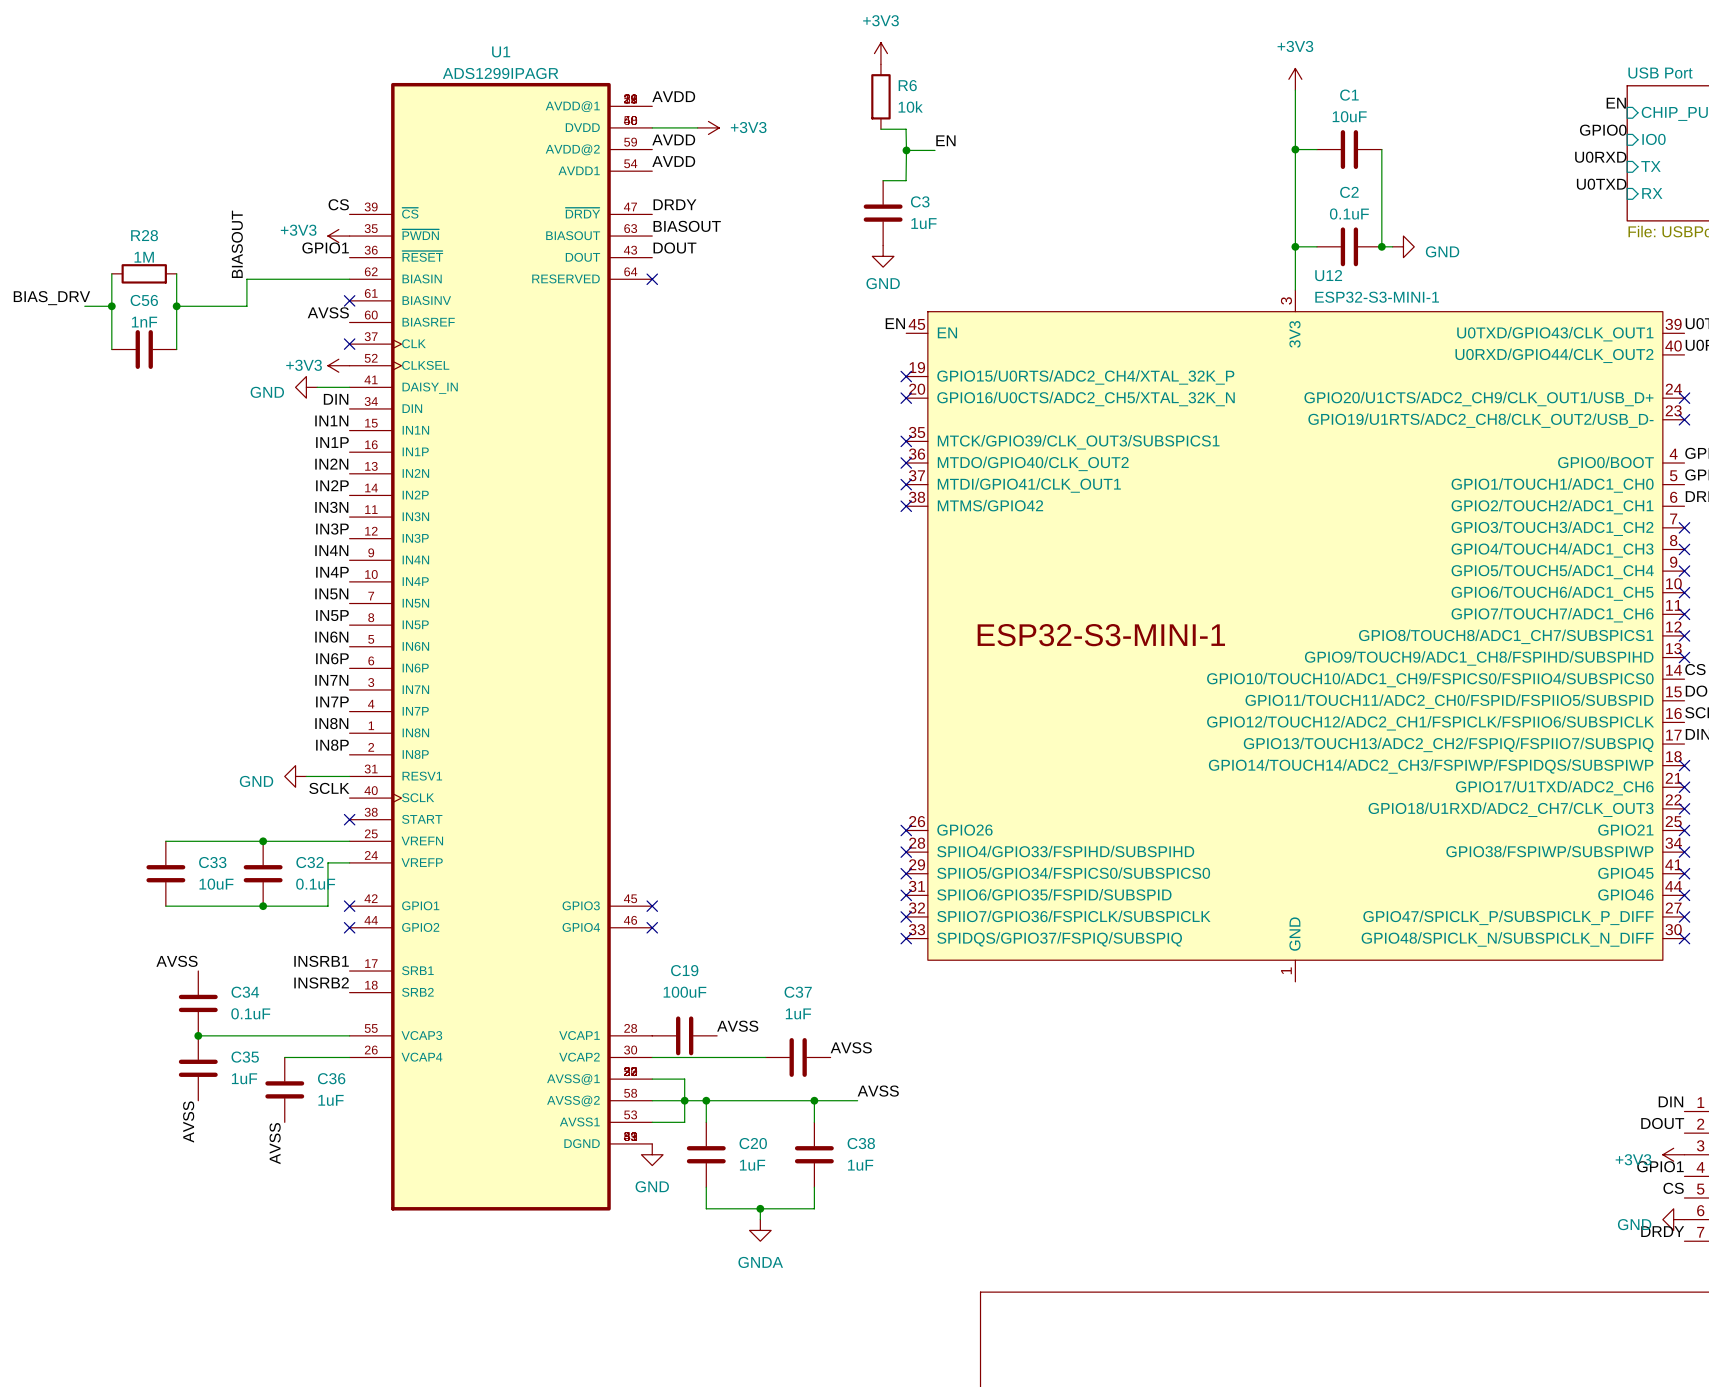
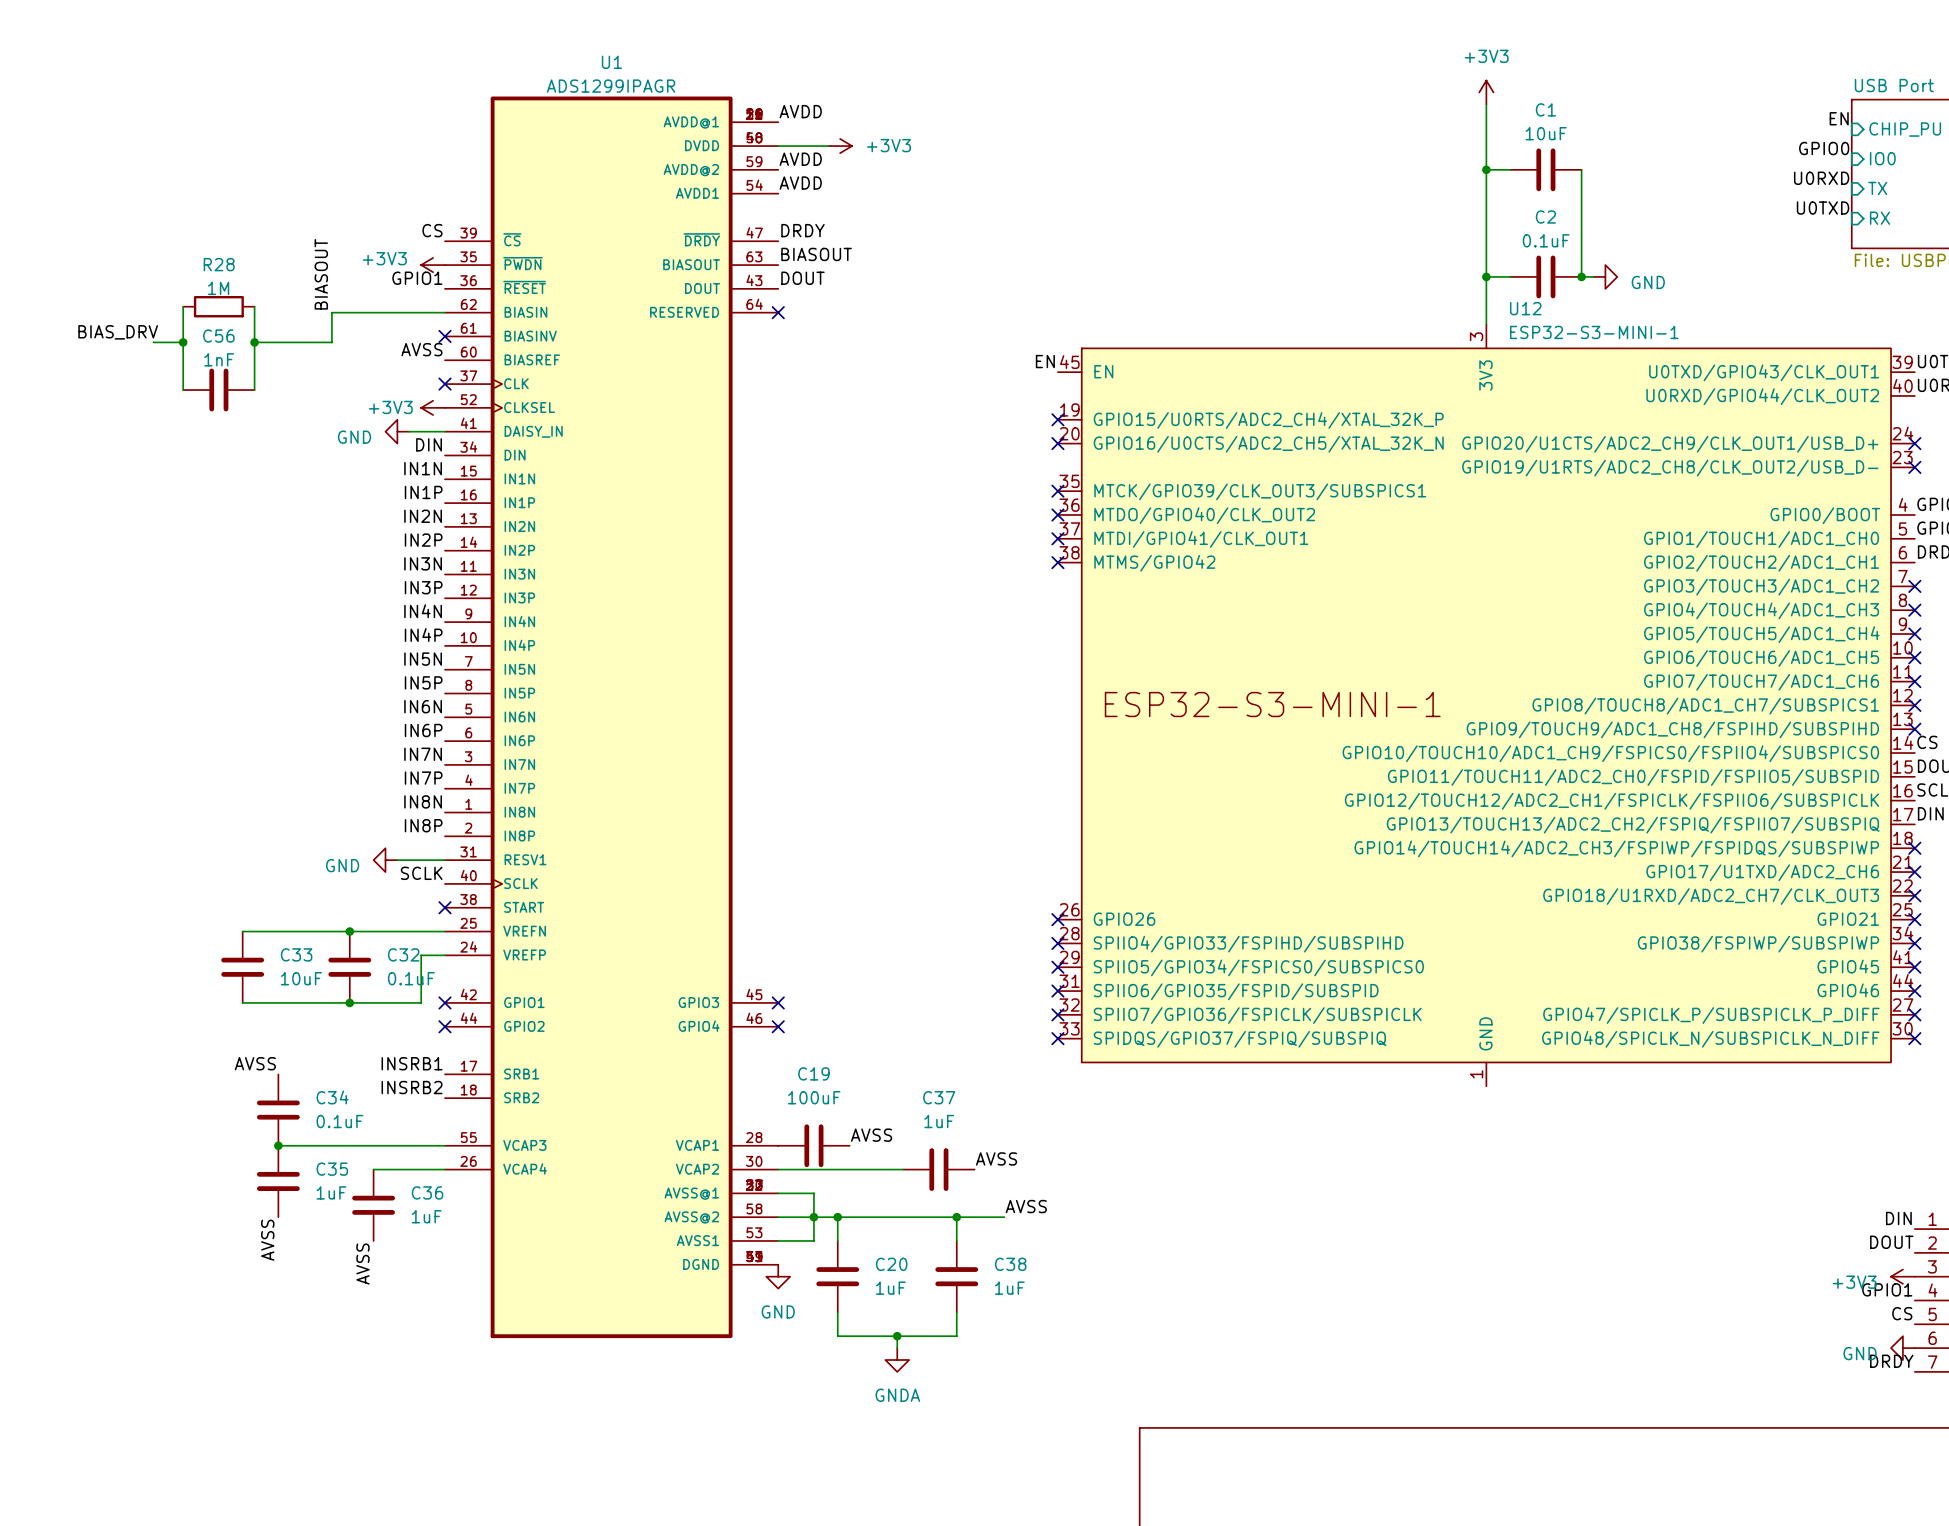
power symbol: +3V3 (880, 53) -> none
R6: 10k (880, 96) -> none
wire: (880, 129) (906, 129) (906, 150) -> none
label: EN (945, 140) -> none
wire: (906, 150) (906, 180) (883, 180) -> none
wire: (906, 150) (935, 150) -> none
junction: (906, 150) -> none
C3: 1uF (883, 213) -> none
power symbol: GND (883, 256) -> none

